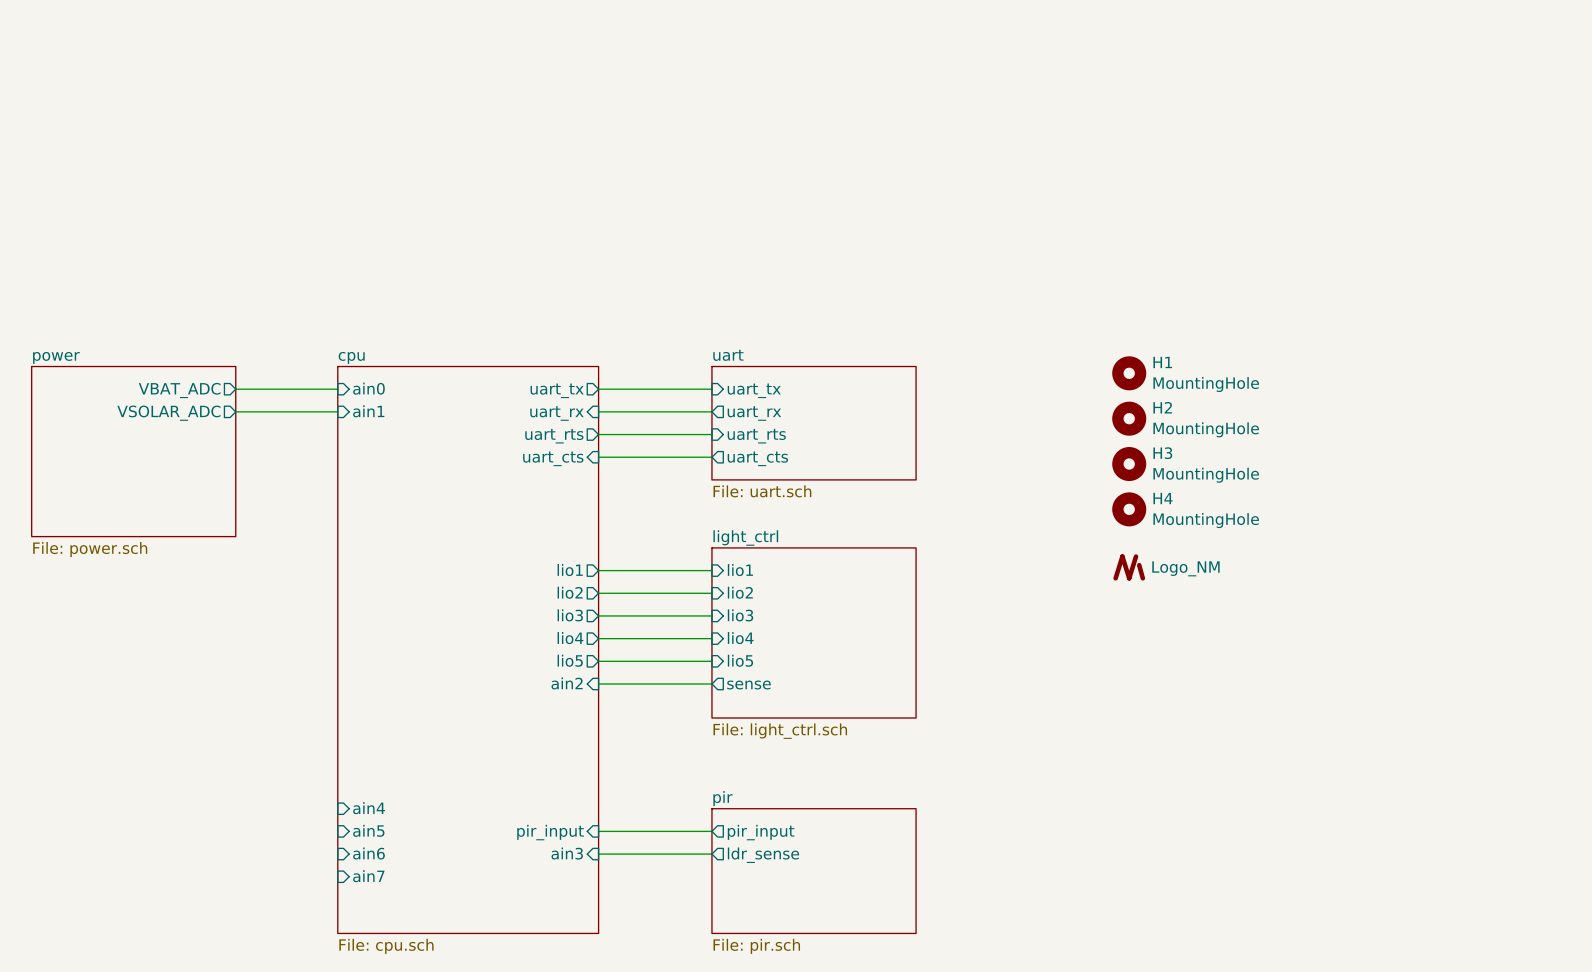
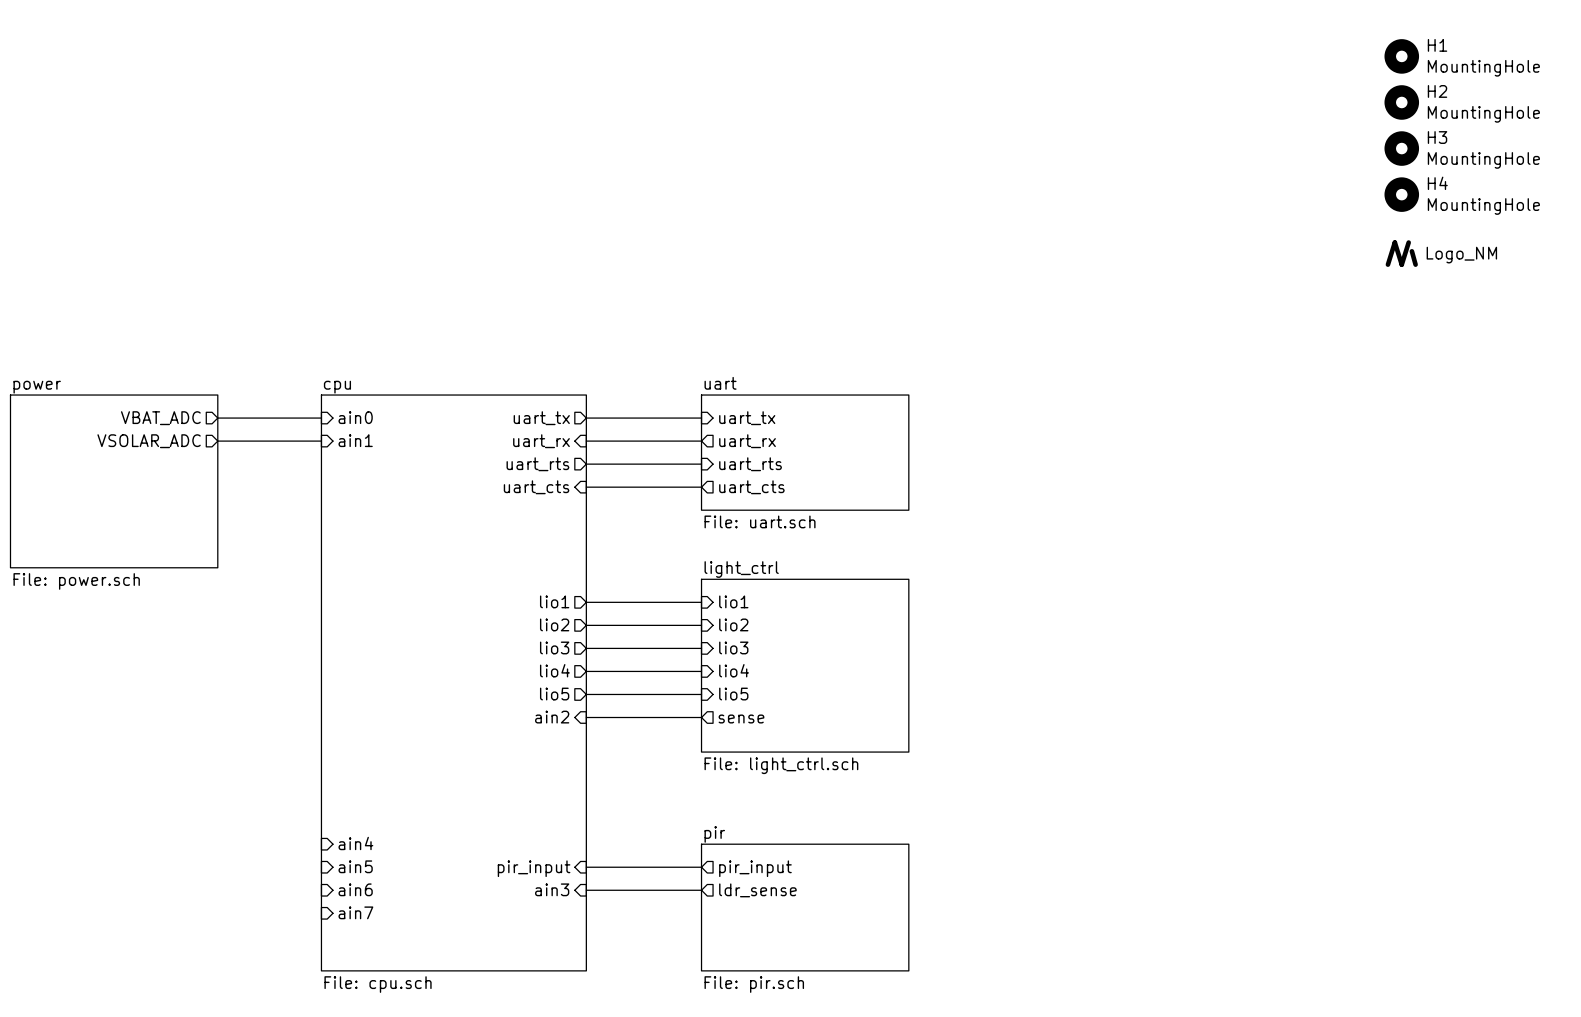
part: none -> Logo_NM (1401, 253)
H1 position: (1129, 373) -> (1401, 56)
H2 position: (1129, 418) -> (1401, 102)
H3 position: (1129, 464) -> (1401, 148)
H4 position: (1129, 509) -> (1401, 194)
part: Logo_NM (1129, 567) -> none

